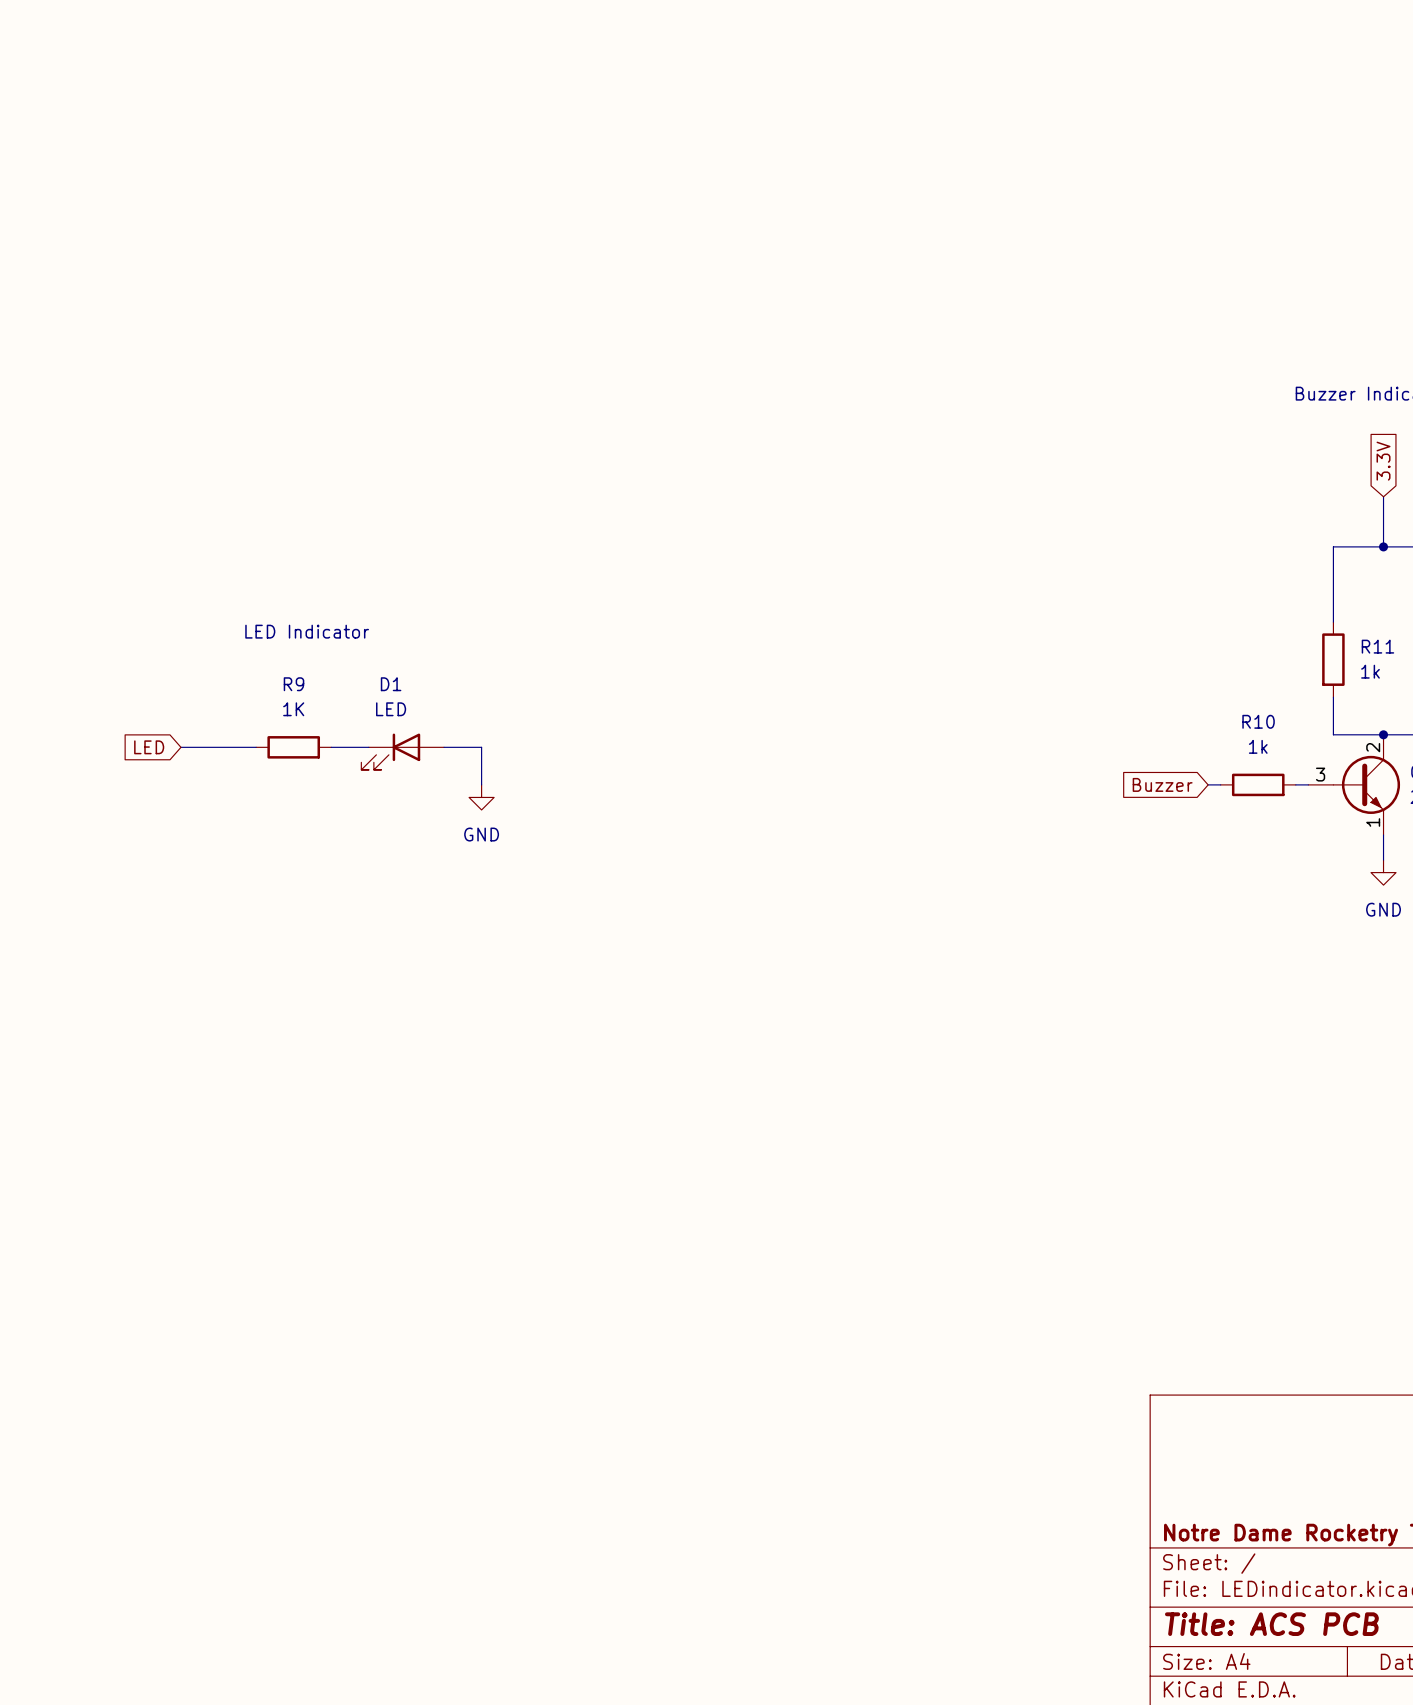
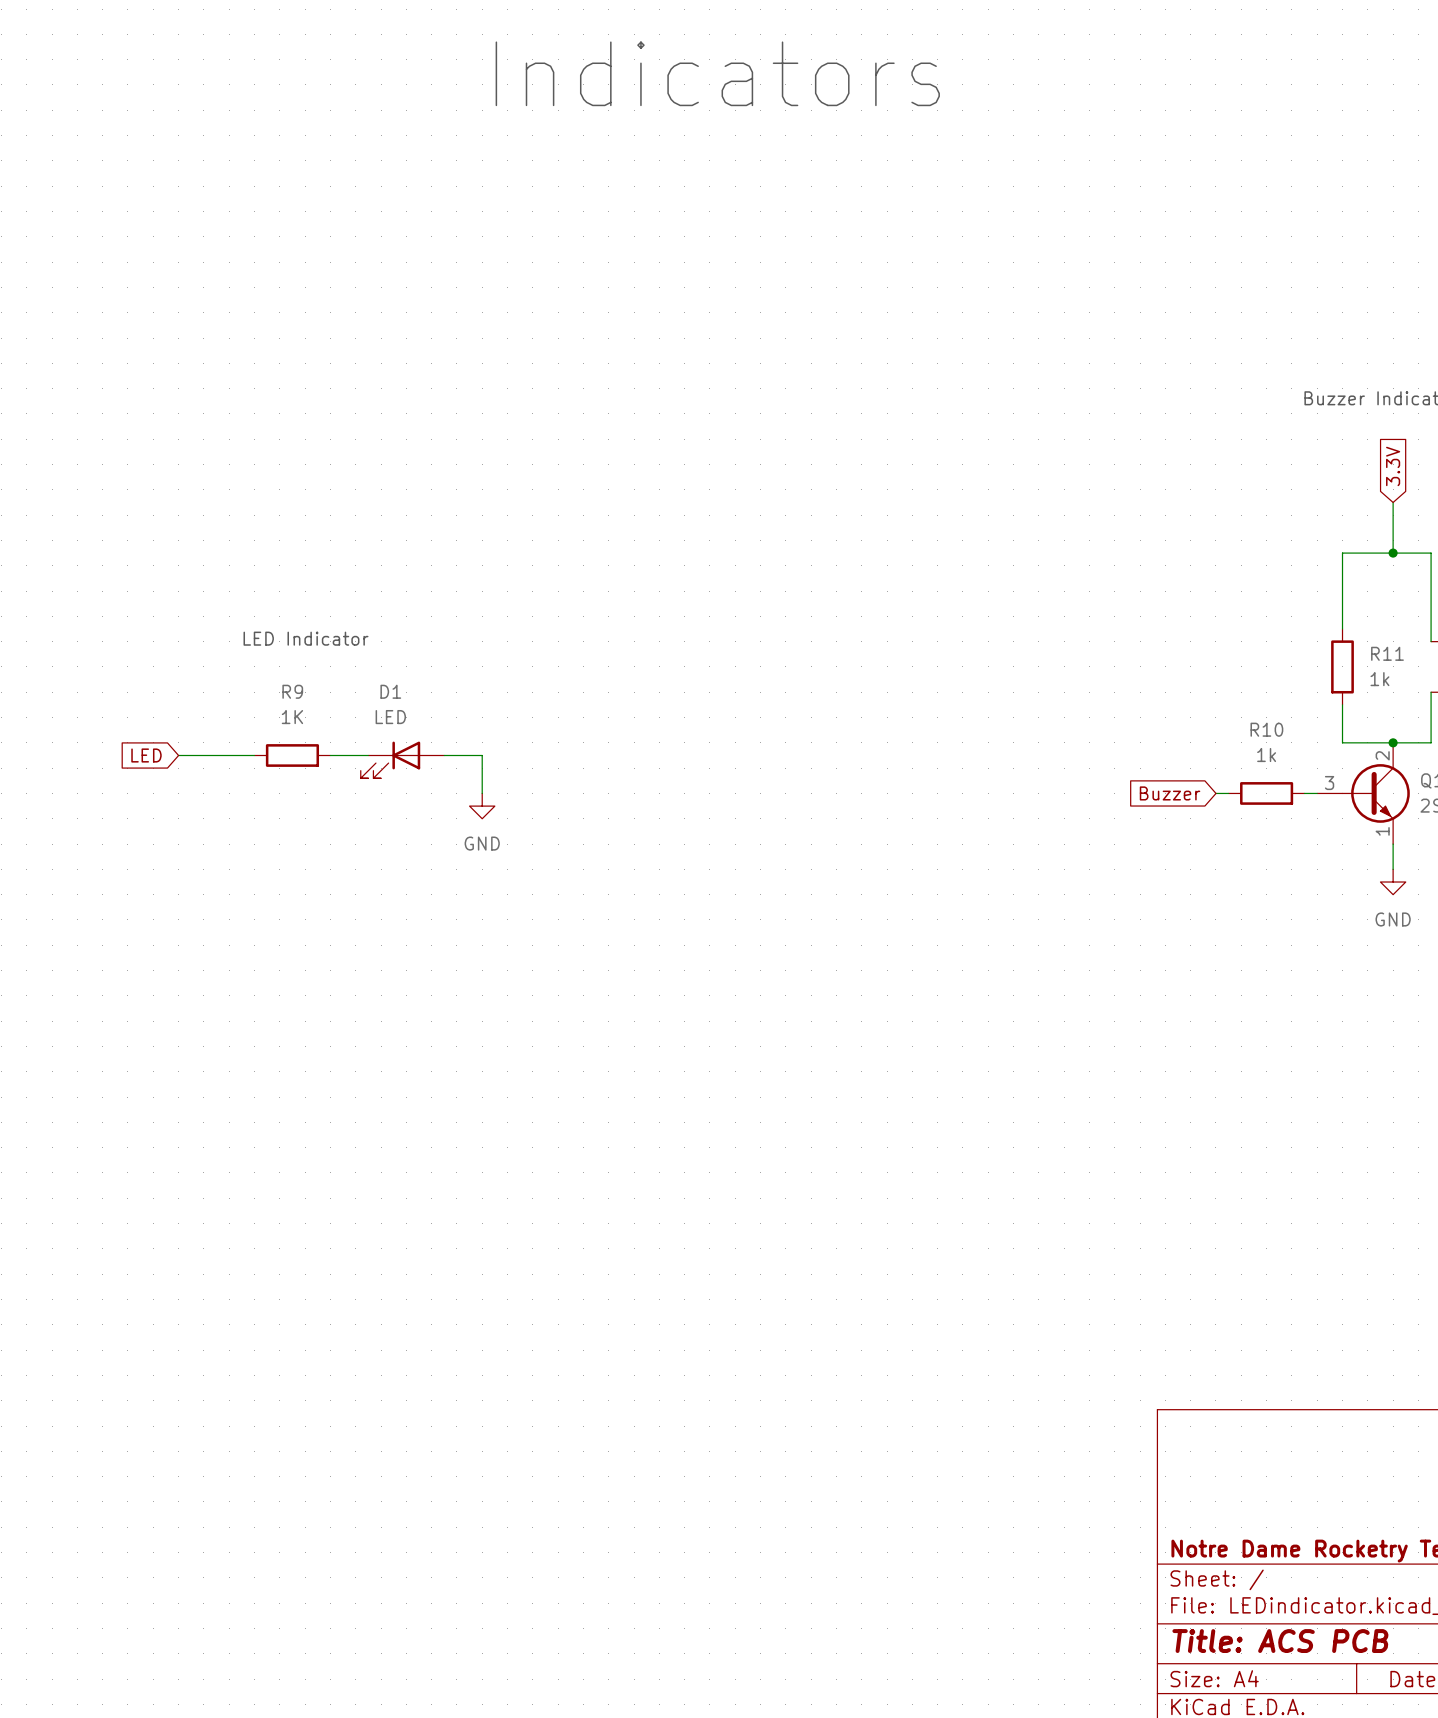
text: none -> Indicators (717, 73)

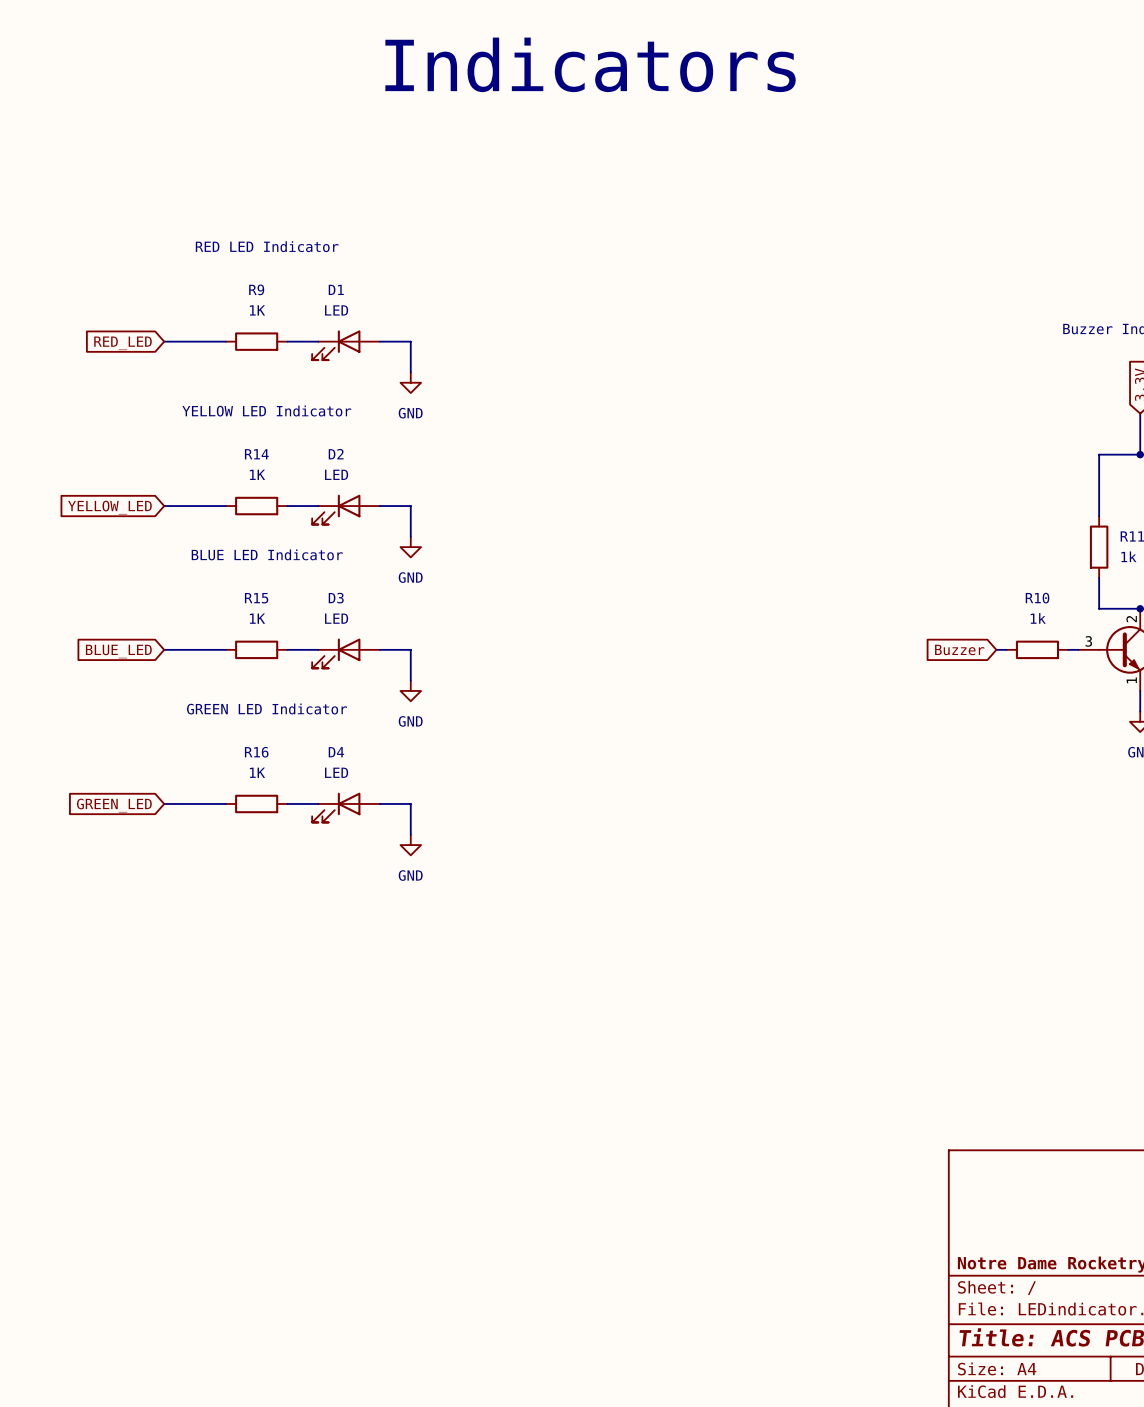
text: none -> RED LED Indicator (267, 246)
wire: none -> (164, 341) (225, 341)
wire: none -> (287, 341) (318, 341)
wire: none -> (379, 341) (410, 341) (410, 372)
global label: none -> RED_LED (123, 343)
power symbol: none -> GND (410, 382)
text: none -> YELLOW LED Indicator (266, 411)
global label: none -> YELLOW_LED (109, 507)
wire: none -> (164, 506) (225, 506)
R14: none -> 1K (256, 506)
wire: none -> (287, 506) (318, 506)
wire: none -> (379, 506) (410, 506) (410, 536)
D2: none -> LED (346, 509)
text: LED Indicator (306, 638) -> none
power symbol: none -> GND (410, 547)
text: none -> BLUE LED Indicator (267, 554)
global label: LED (146, 755) -> none
wire: (178, 755) (254, 755) -> (164, 649) (225, 649)
R9 position: (292, 755) -> (256, 341)
wire: (330, 755) (368, 755) -> (287, 649) (318, 649)
wire: (444, 755) (482, 755) (482, 793) -> (379, 649) (410, 649) (410, 680)
D1 position: (402, 759) -> (346, 345)
R15: none -> 1K (256, 649)
global label: none -> BLUE_LED (118, 651)
D3: none -> LED (346, 653)
power symbol position: GND (482, 806) -> GND (410, 690)
text: none -> GREEN LED Indicator (267, 708)
global label: none -> GREEN_LED (114, 805)
wire: none -> (164, 803) (225, 803)
R16: none -> 1K (256, 803)
wire: none -> (287, 803) (318, 803)
wire: none -> (379, 803) (410, 803) (410, 834)
D4: none -> LED (346, 807)
power symbol: none -> GND (410, 845)

